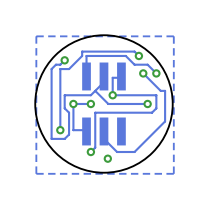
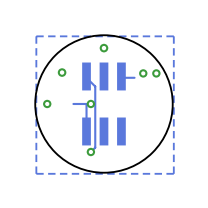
via: none -> (103, 48)
track: (138, 55) (134, 51) (82, 51) (82, 55) (69, 69) (60, 69) (60, 130) -> none
via: (138, 55) -> none
track: (64, 60) (51, 69) (51, 138) (64, 138) (69, 134) (69, 112) (64, 108) (64, 95) (90, 95) (103, 82) (103, 76) -> none
via: (64, 60) -> none
via: none -> (62, 72)
track: (143, 73) (160, 90) (165, 90) (165, 121) (134, 151) (117, 151) (103, 138) (103, 131) -> none
track: (156, 73) (147, 64) (134, 64) (125, 55) (86, 55) (86, 76) -> none
track: (121, 77) (112, 77) (112, 95) (156, 95) (156, 108) (151, 112) (95, 112) -> (86, 76) (95, 86) (95, 112)
track: none -> (134, 77) (121, 77)
track: (95, 90) (108, 103) (147, 103) -> none
via: (112, 95) -> none
via: none -> (47, 103)
track: (73, 103) (73, 130) (86, 130) -> (86, 103) (86, 130)
via: (73, 103) -> none
via: (147, 103) -> none
via: (60, 130) -> none
via: (107, 158) -> none

